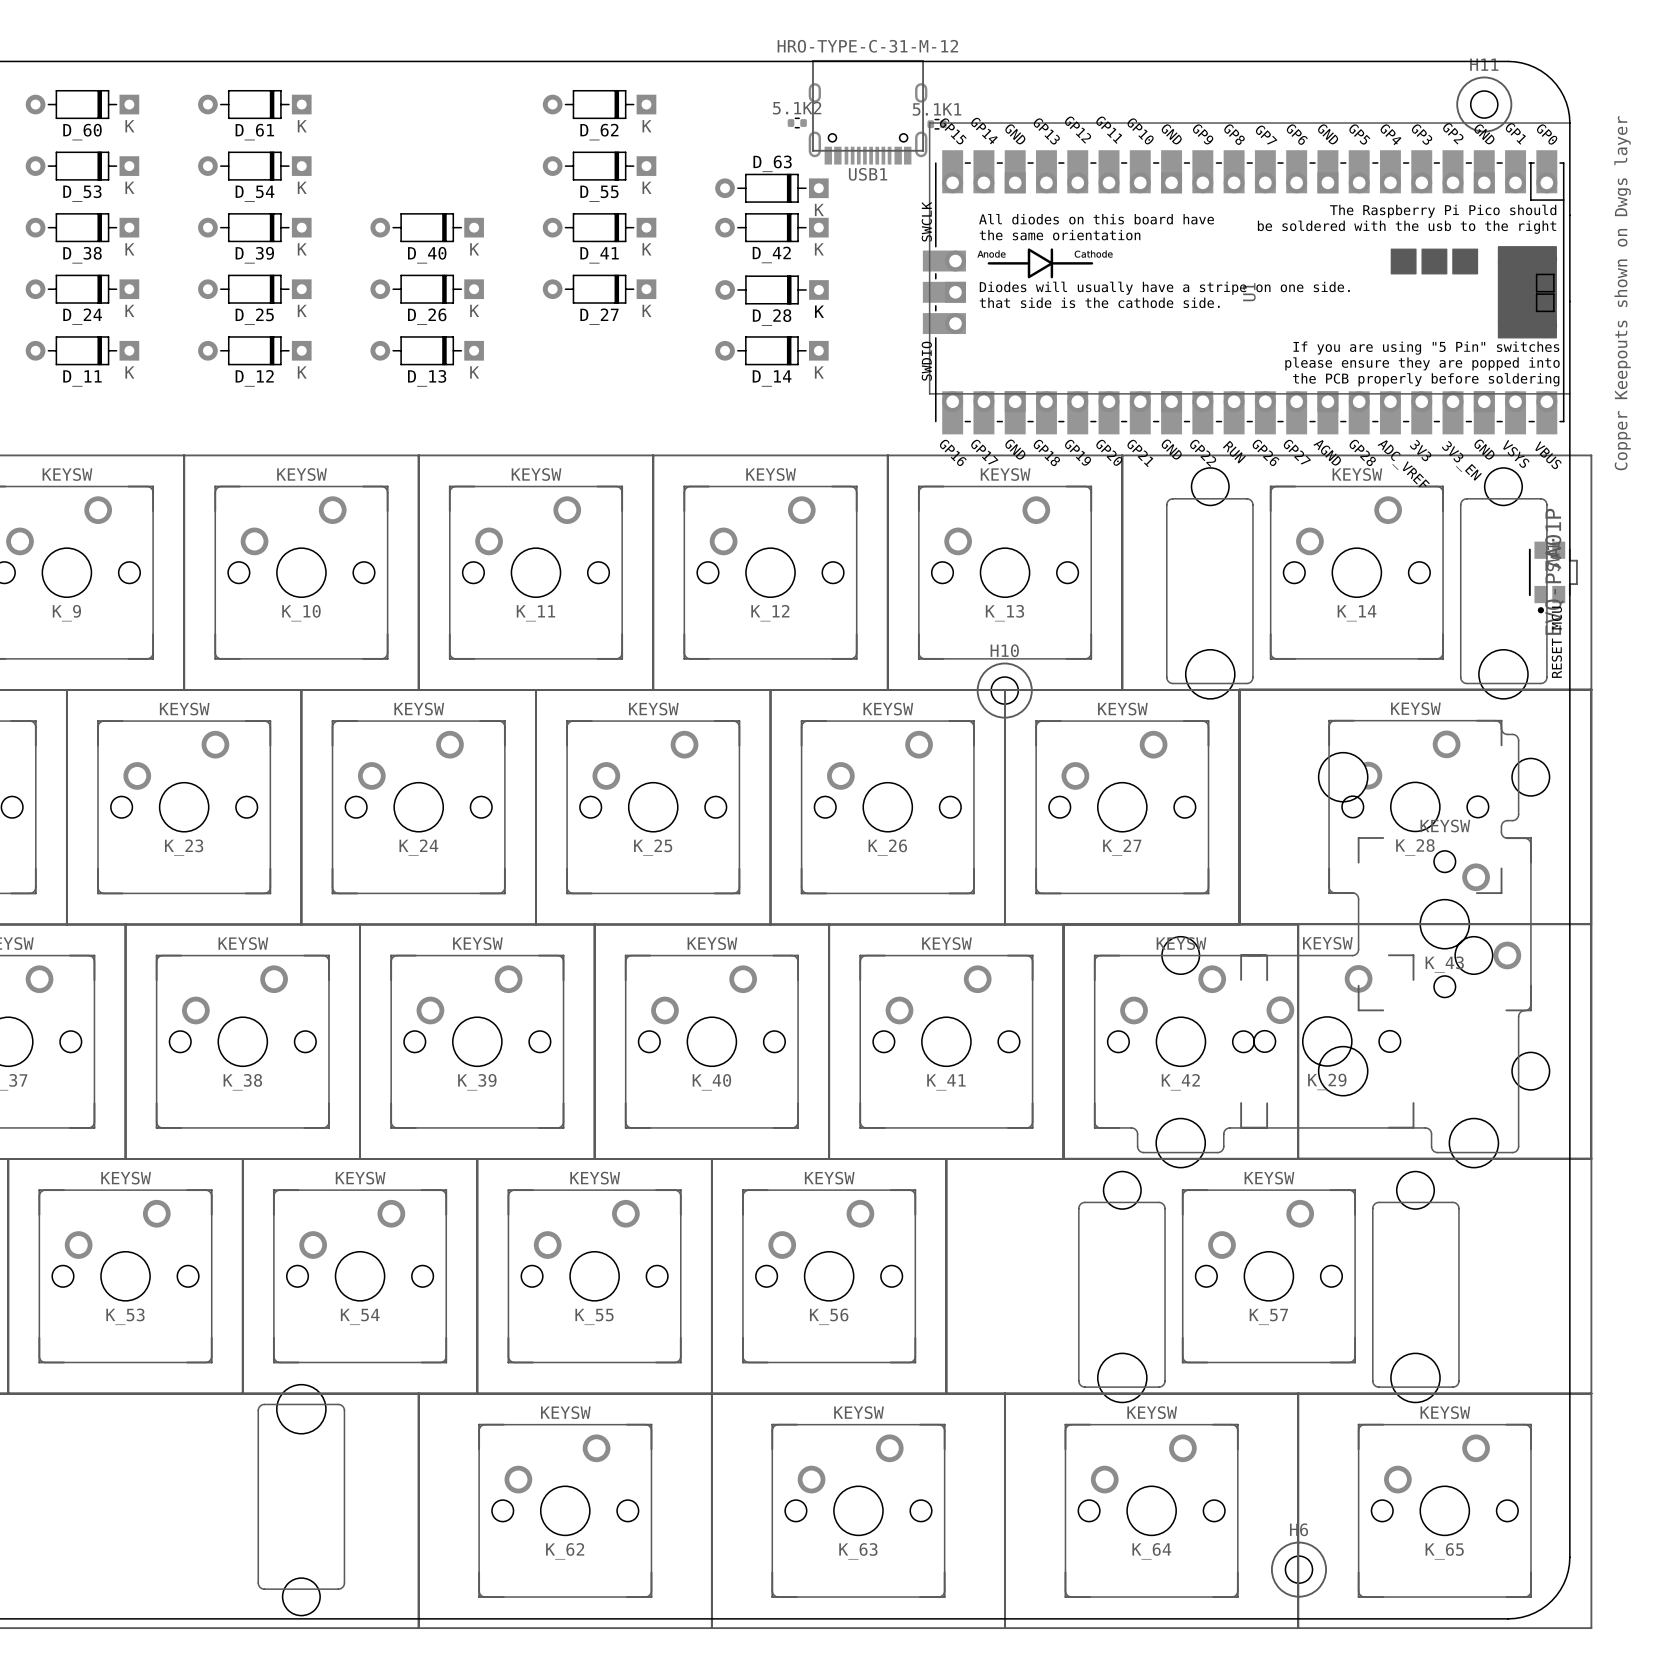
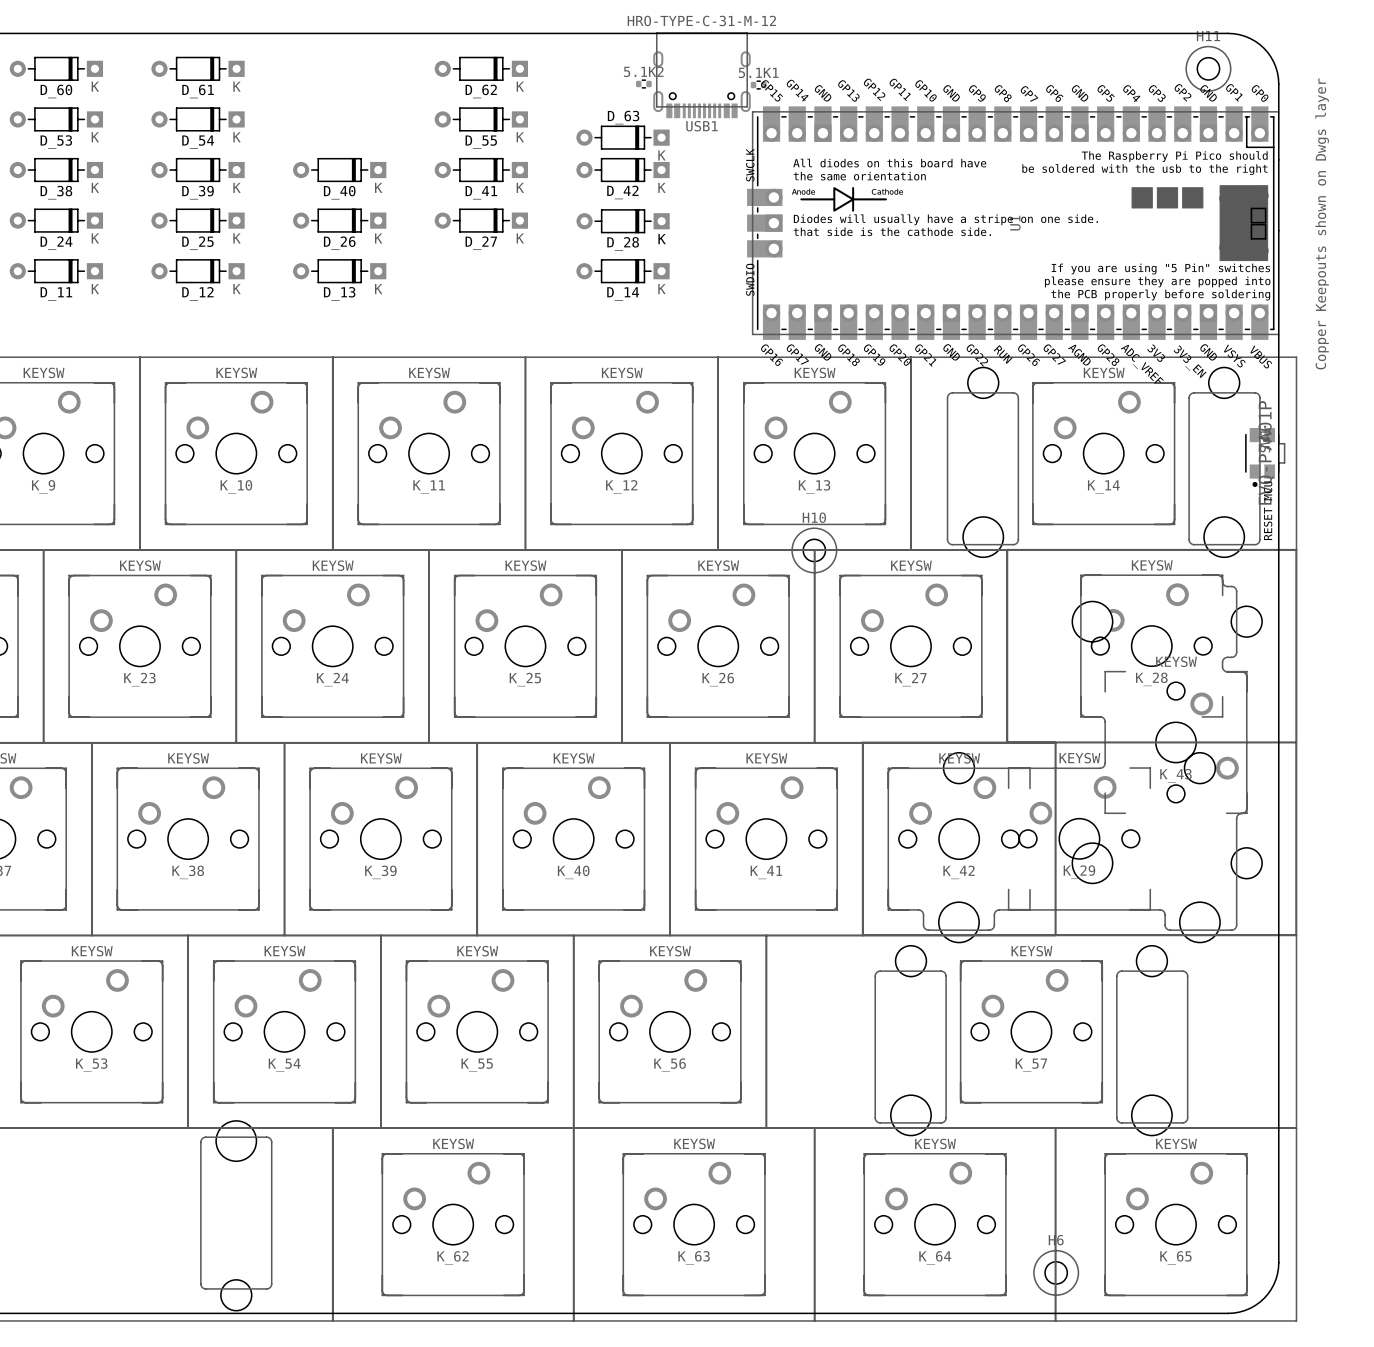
line: (1569, 123) (929, 123) (929, 156) -> (1278, 111) (752, 111)
line: (929, 393) (1569, 393) -> (752, 306) (752, 334) (1278, 334)

